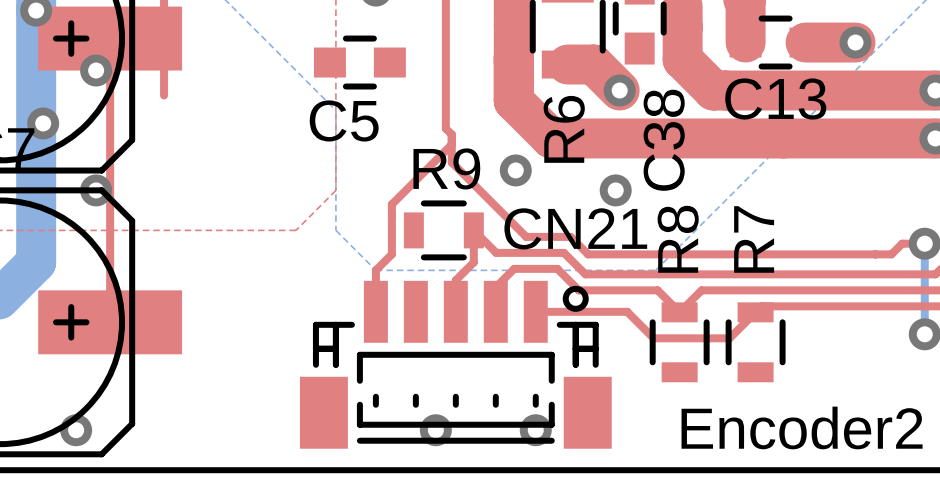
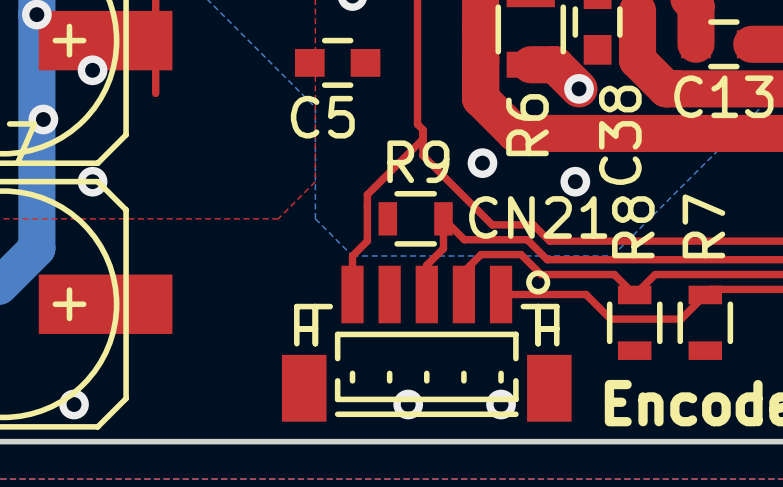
top track: (110, 38) (110, 322) -> none

